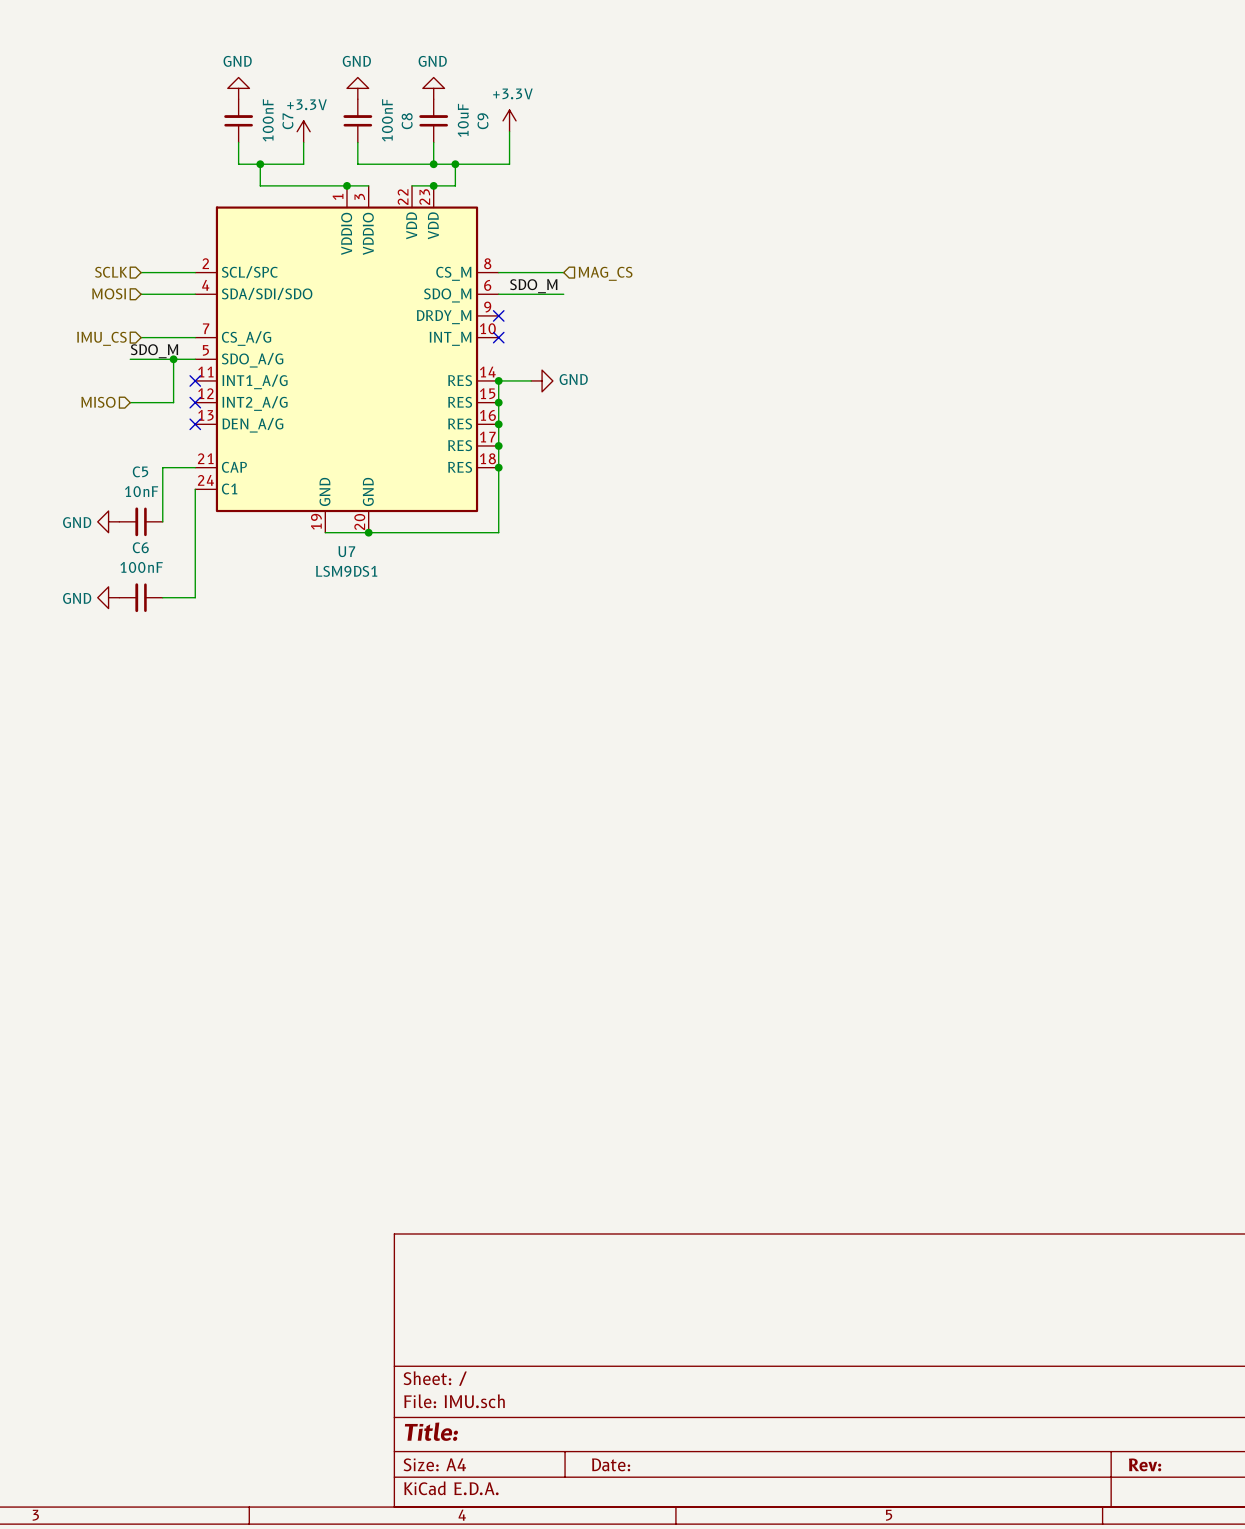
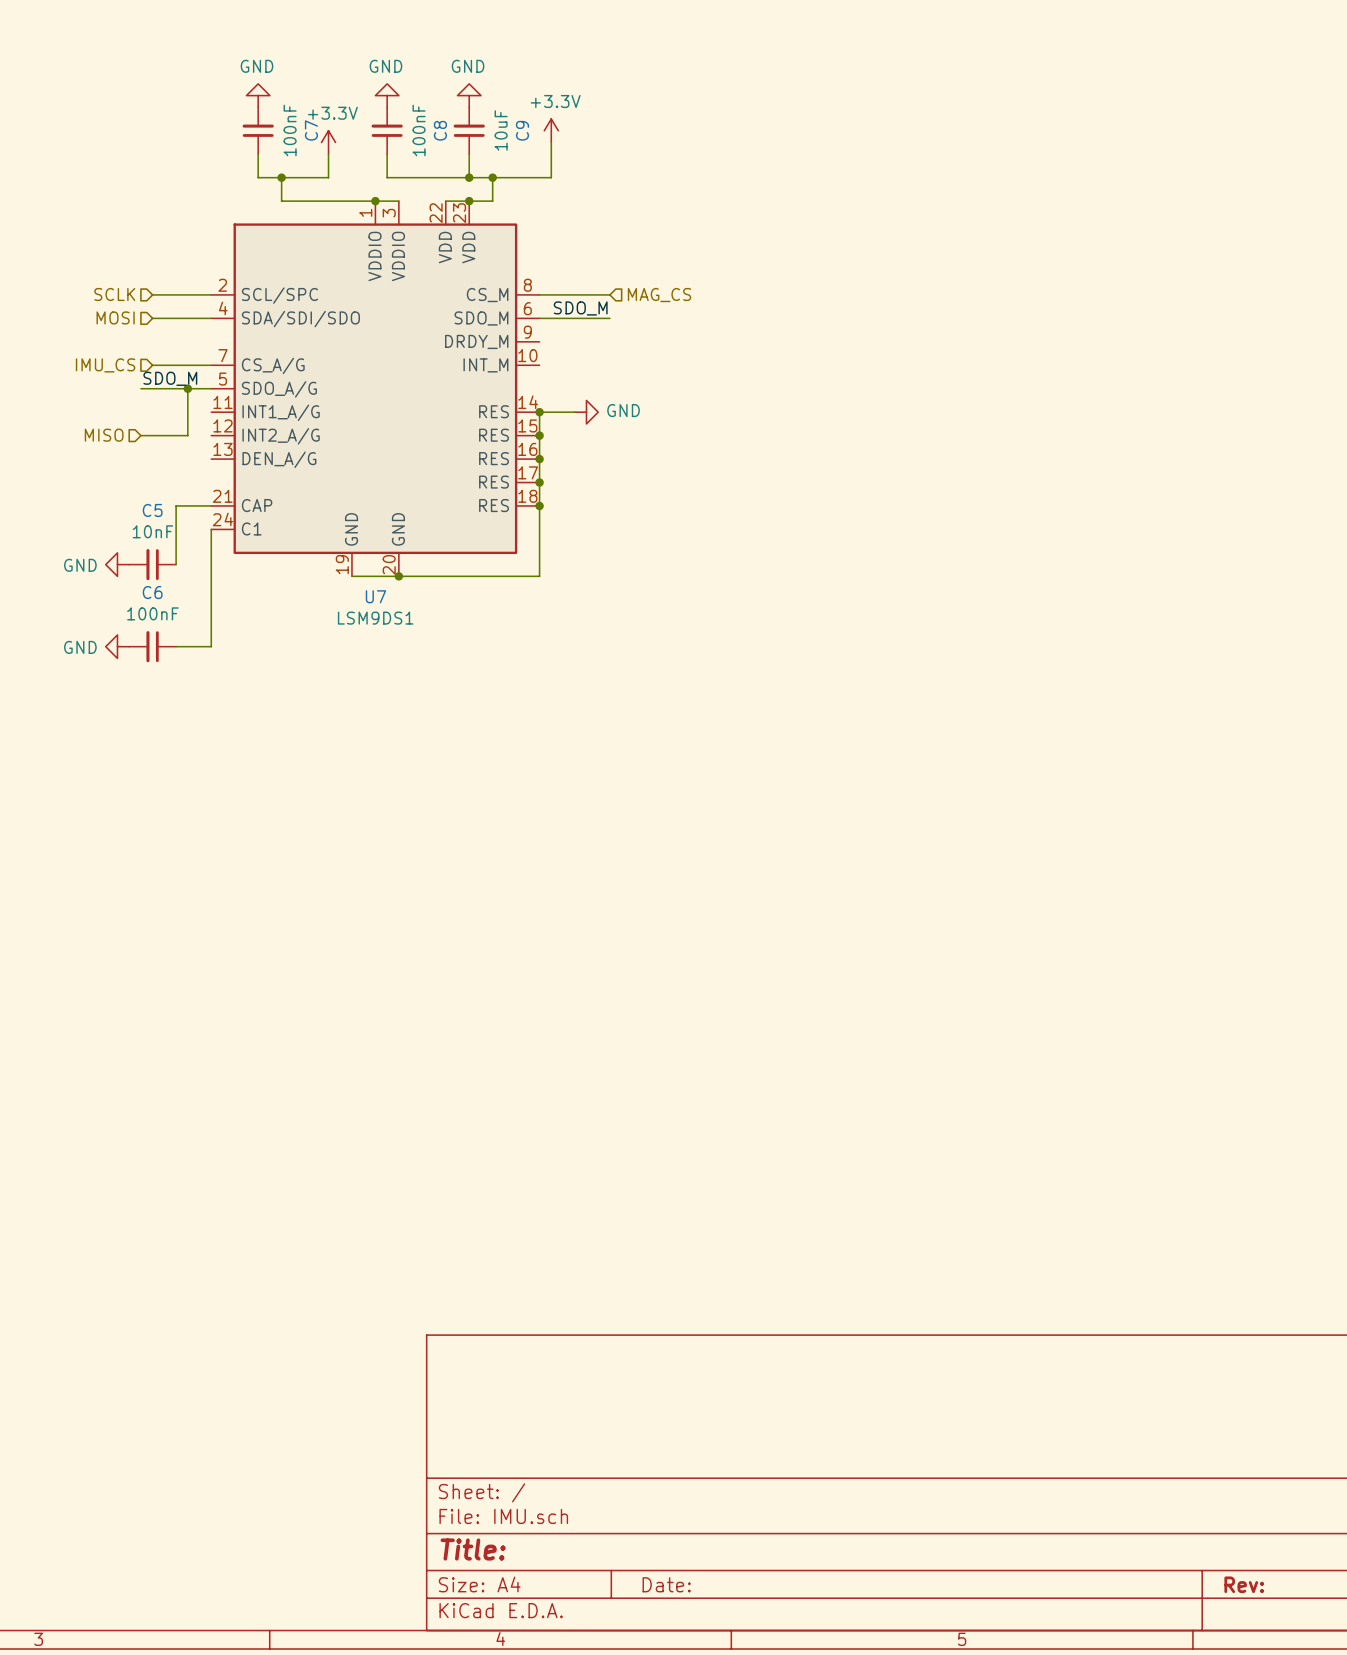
no-connect mark: (498, 315) -> none
no-connect mark: (498, 337) -> none
no-connect mark: (195, 380) -> none
no-connect mark: (195, 402) -> none
no-connect mark: (195, 424) -> none

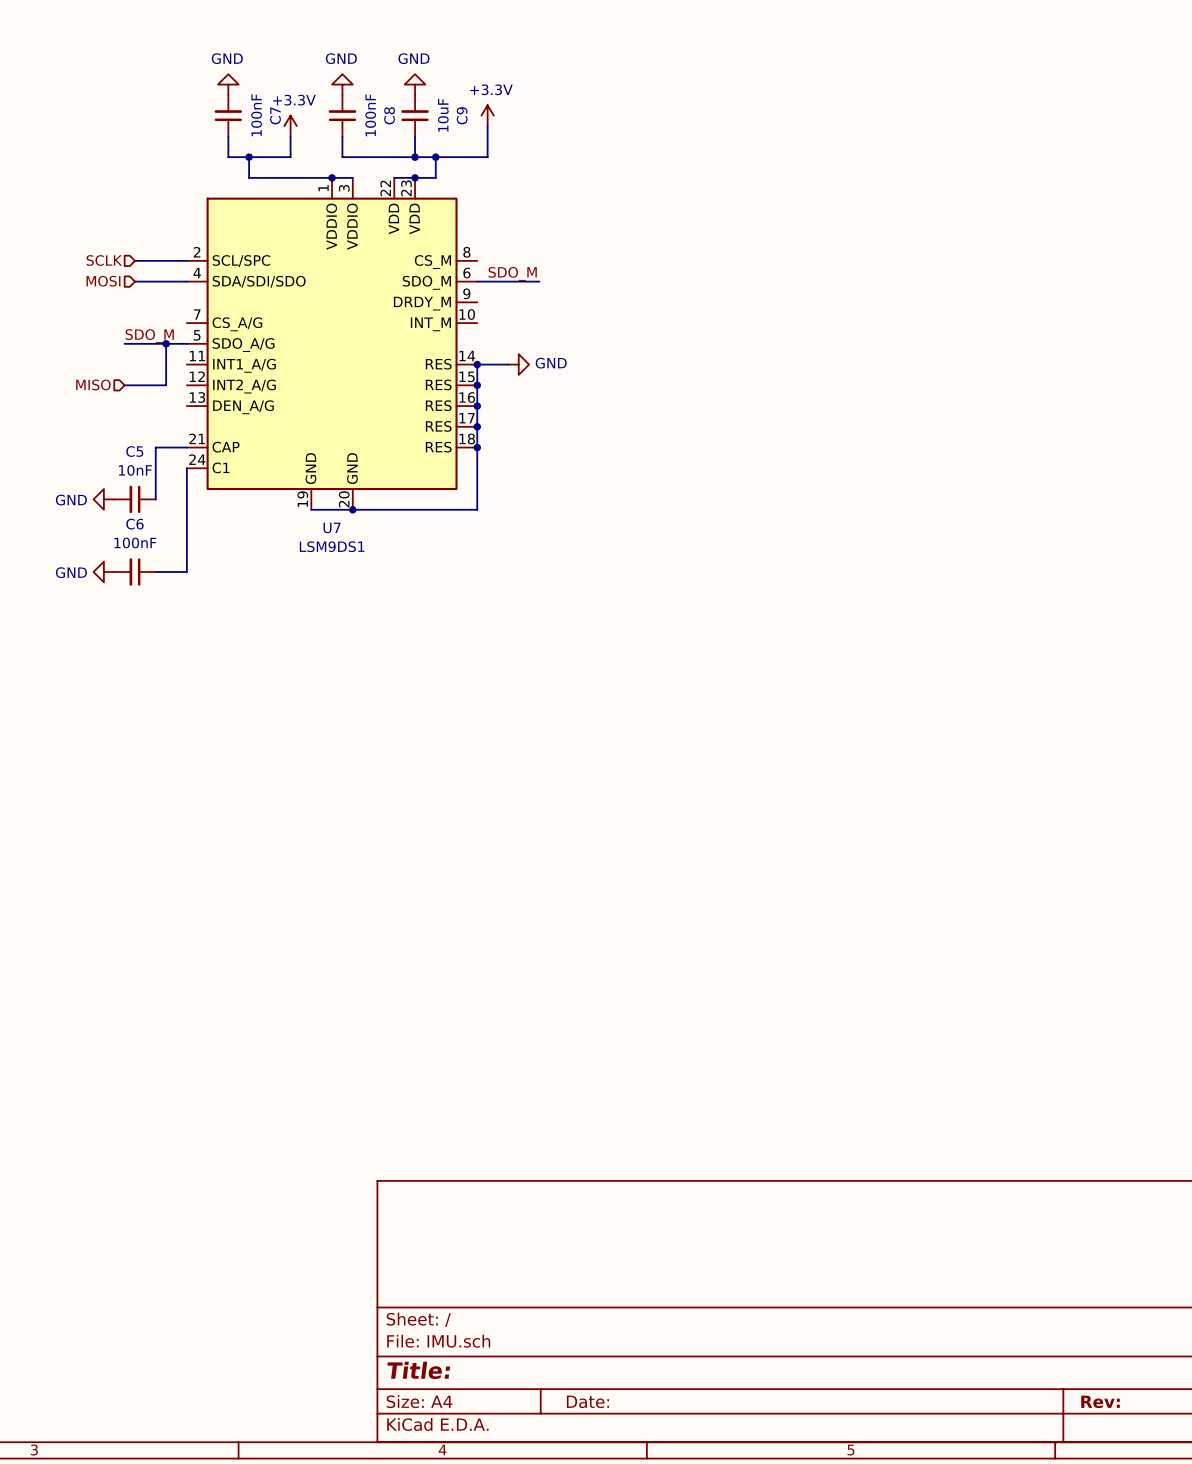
wire: (539, 294) (609, 294) -> none
hierarchical label: MAG_CS (659, 295) -> none
hierarchical label: IMU_CS (105, 365) -> none
wire: (152, 365) (211, 365) -> none

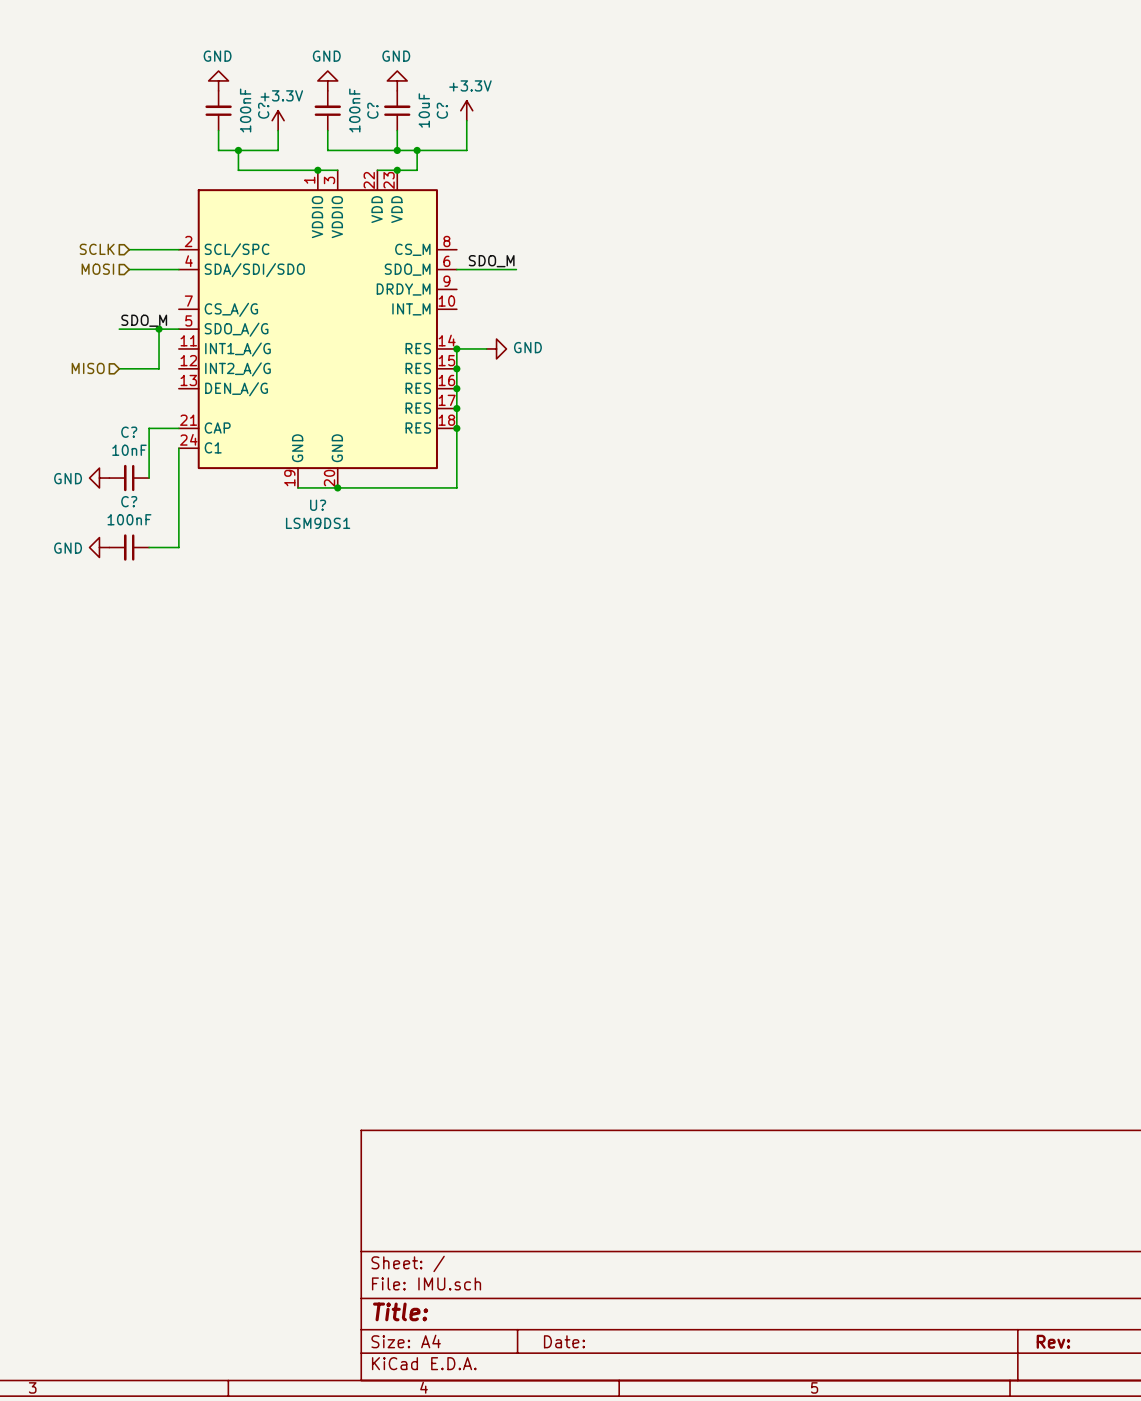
C7 name: C7 (275, 115) -> C? (263, 110)
C8 name: C8 (389, 115) -> C? (372, 110)
C9 name: C9 (462, 115) -> C? (442, 110)
C5 name: C5 (134, 451) -> C? (129, 432)
C6 name: C6 (134, 524) -> C? (129, 501)
U7 name: U7 (332, 527) -> U? (318, 505)

